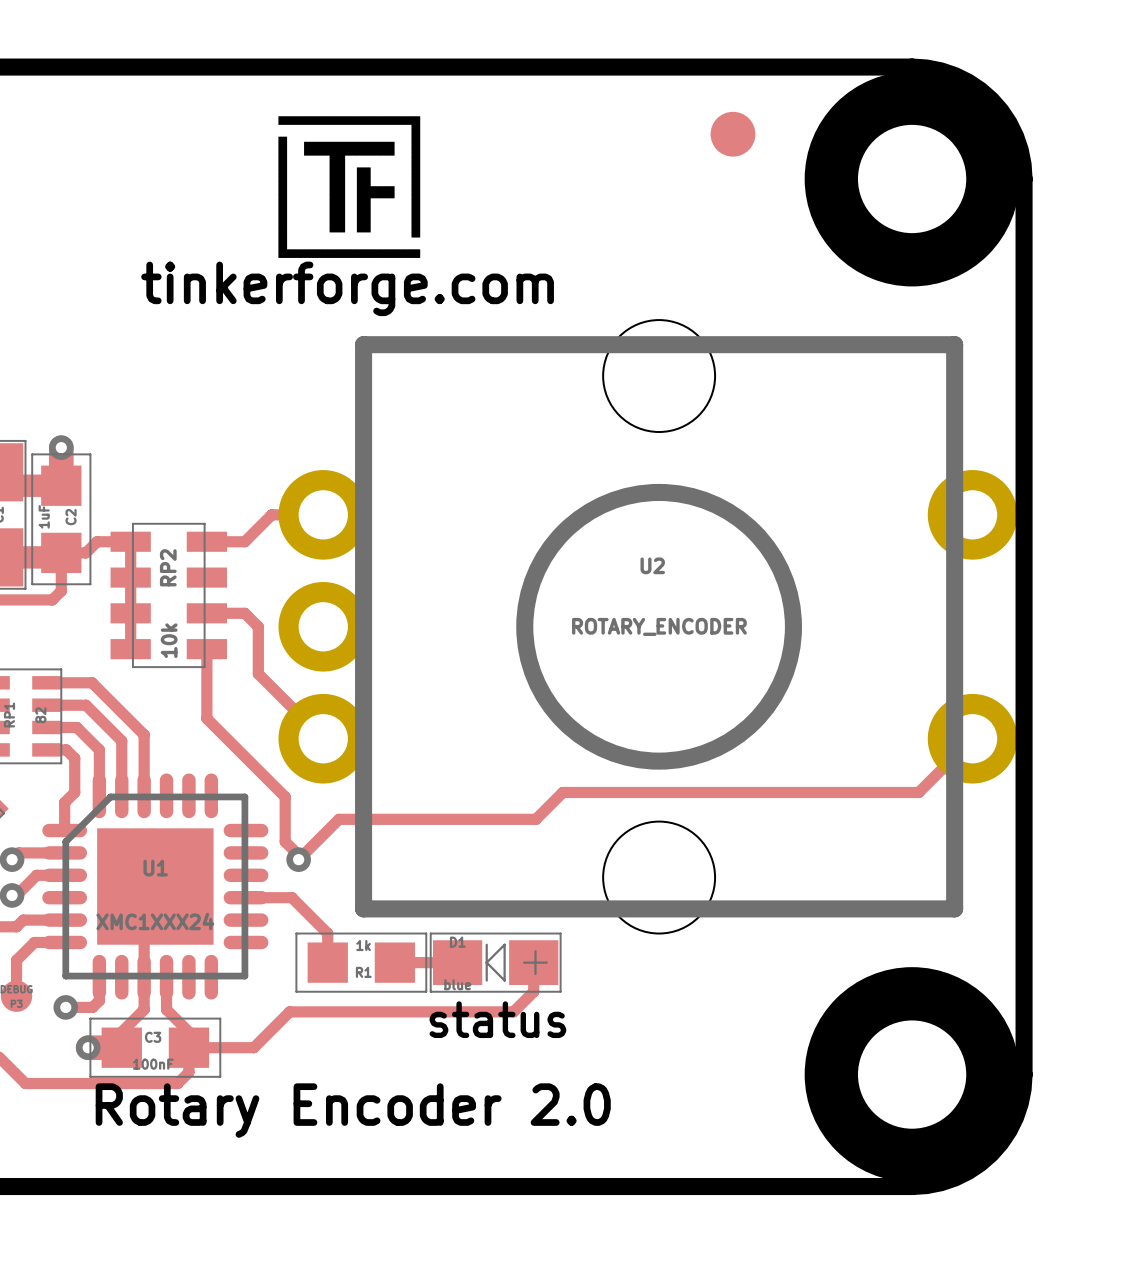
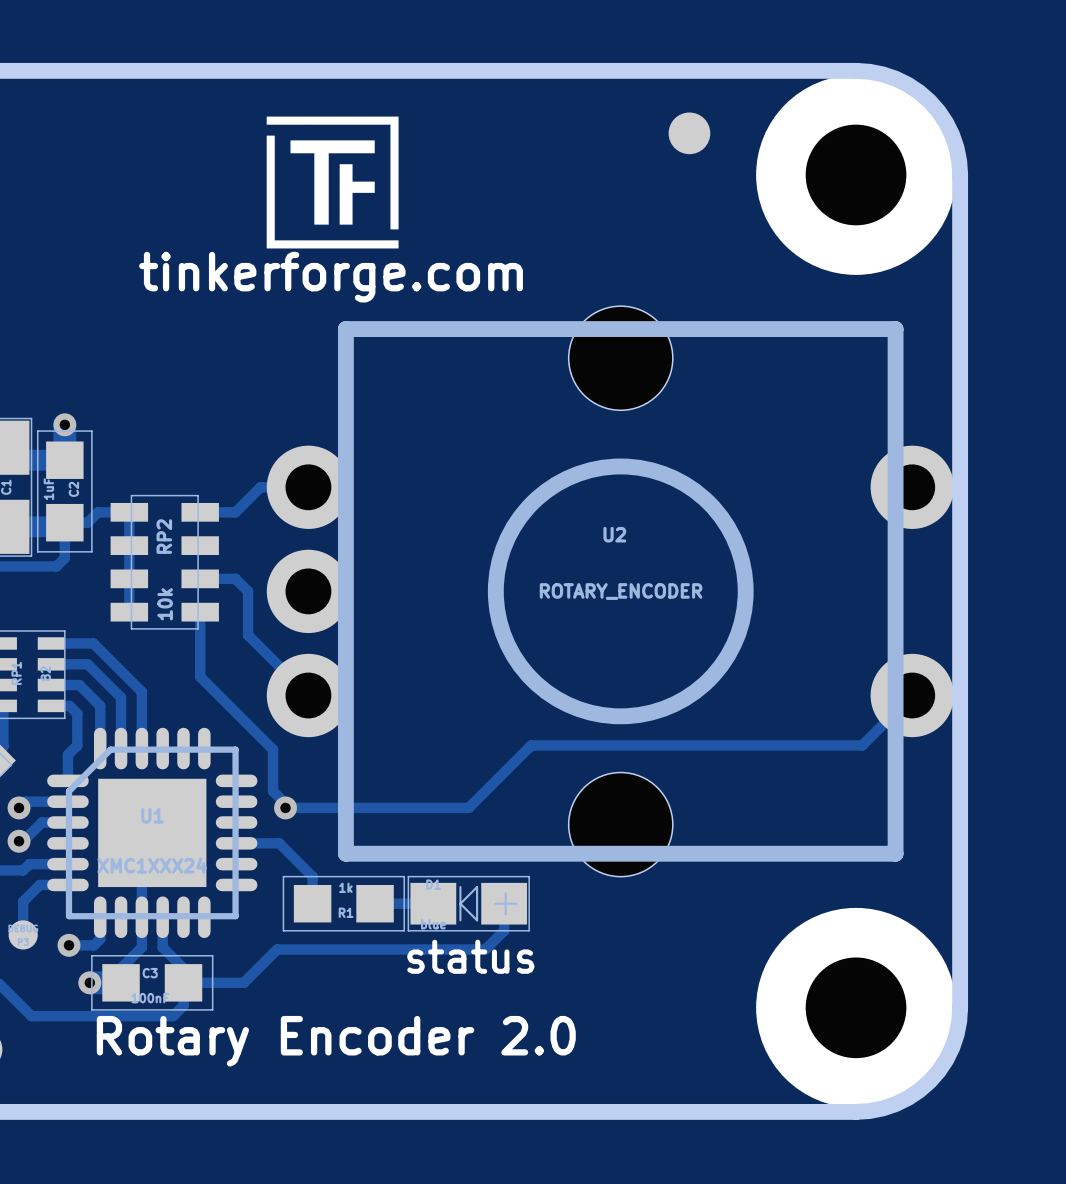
track: (535, 819) (338, 819) (298, 859) -> (506, 770) (468, 807) (285, 807)

